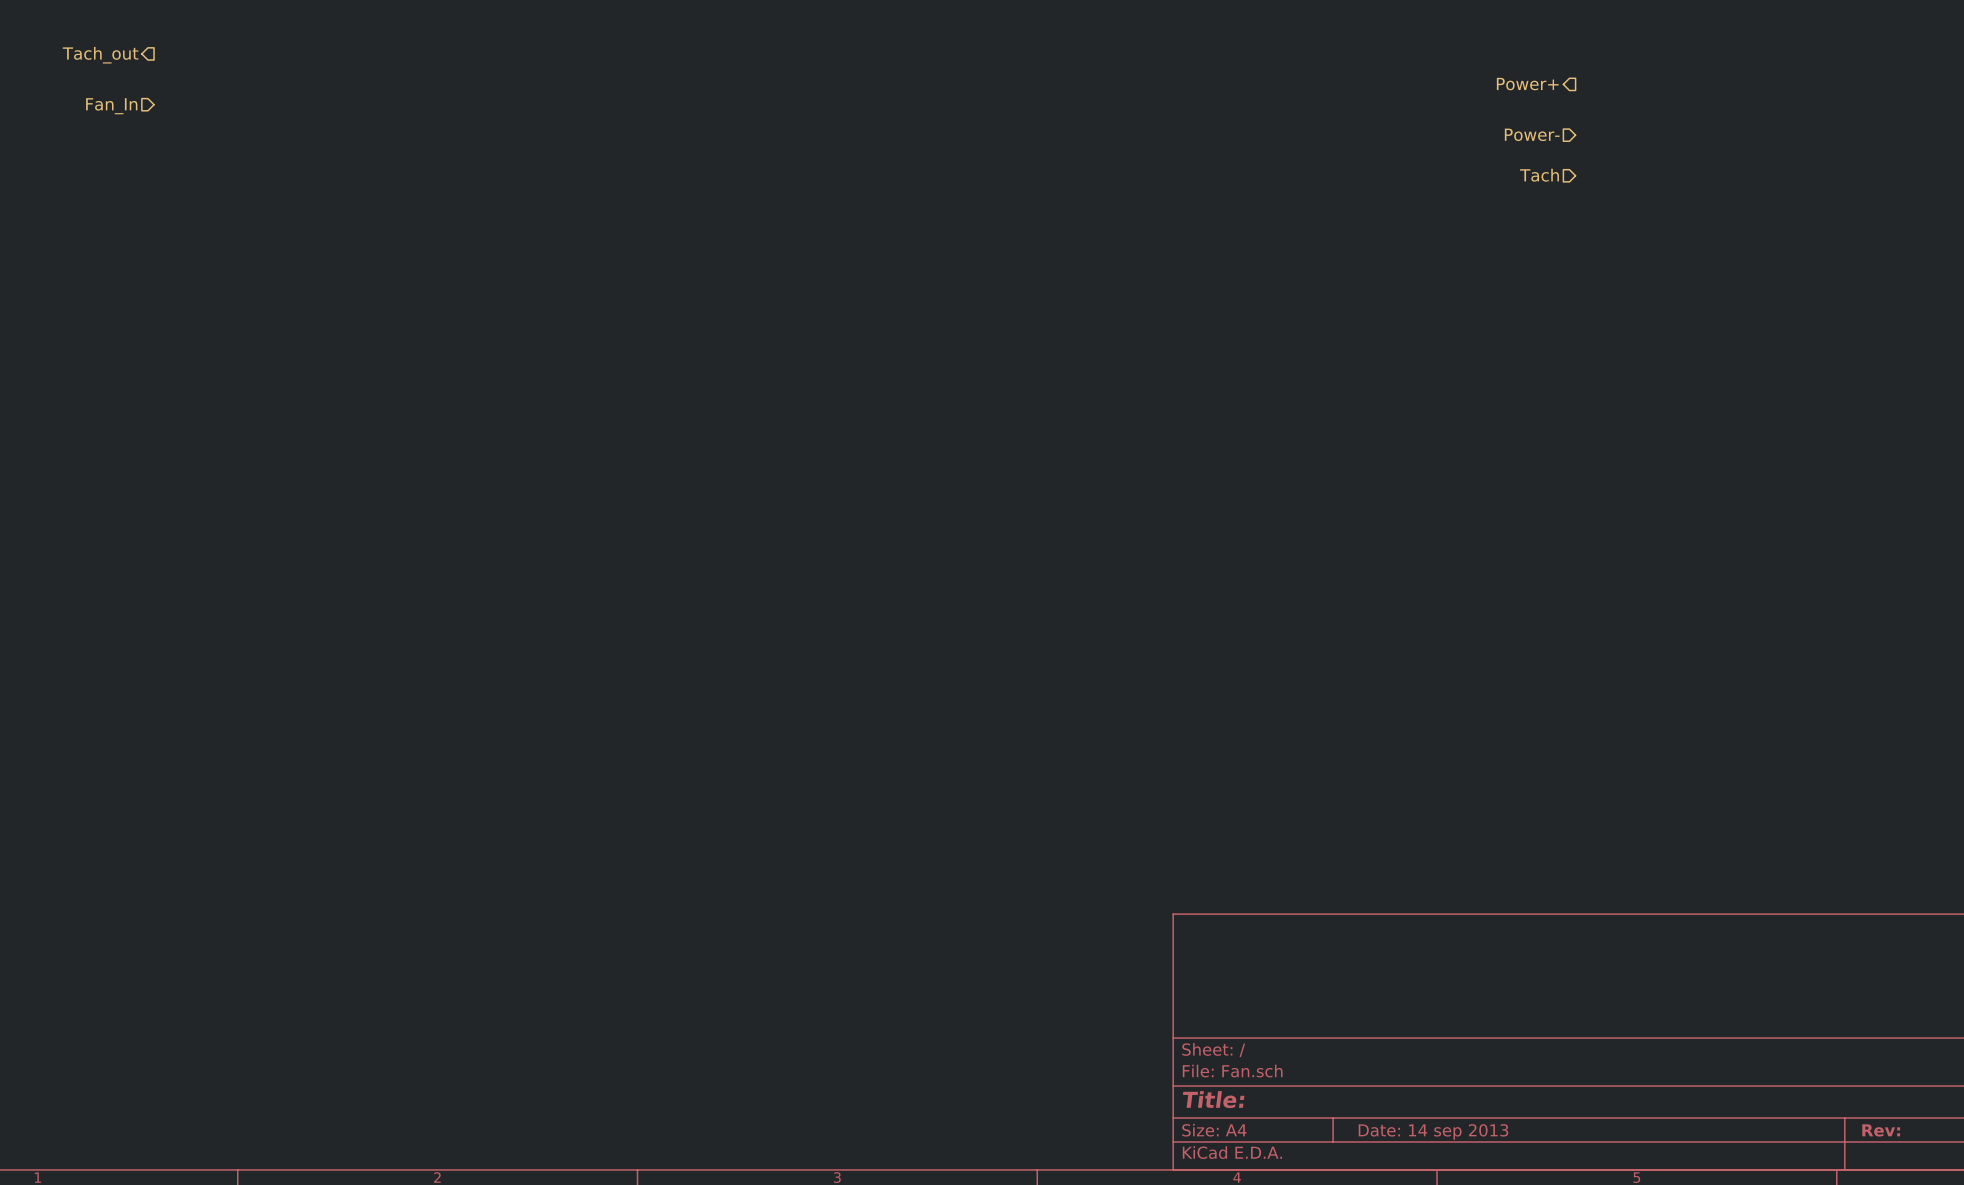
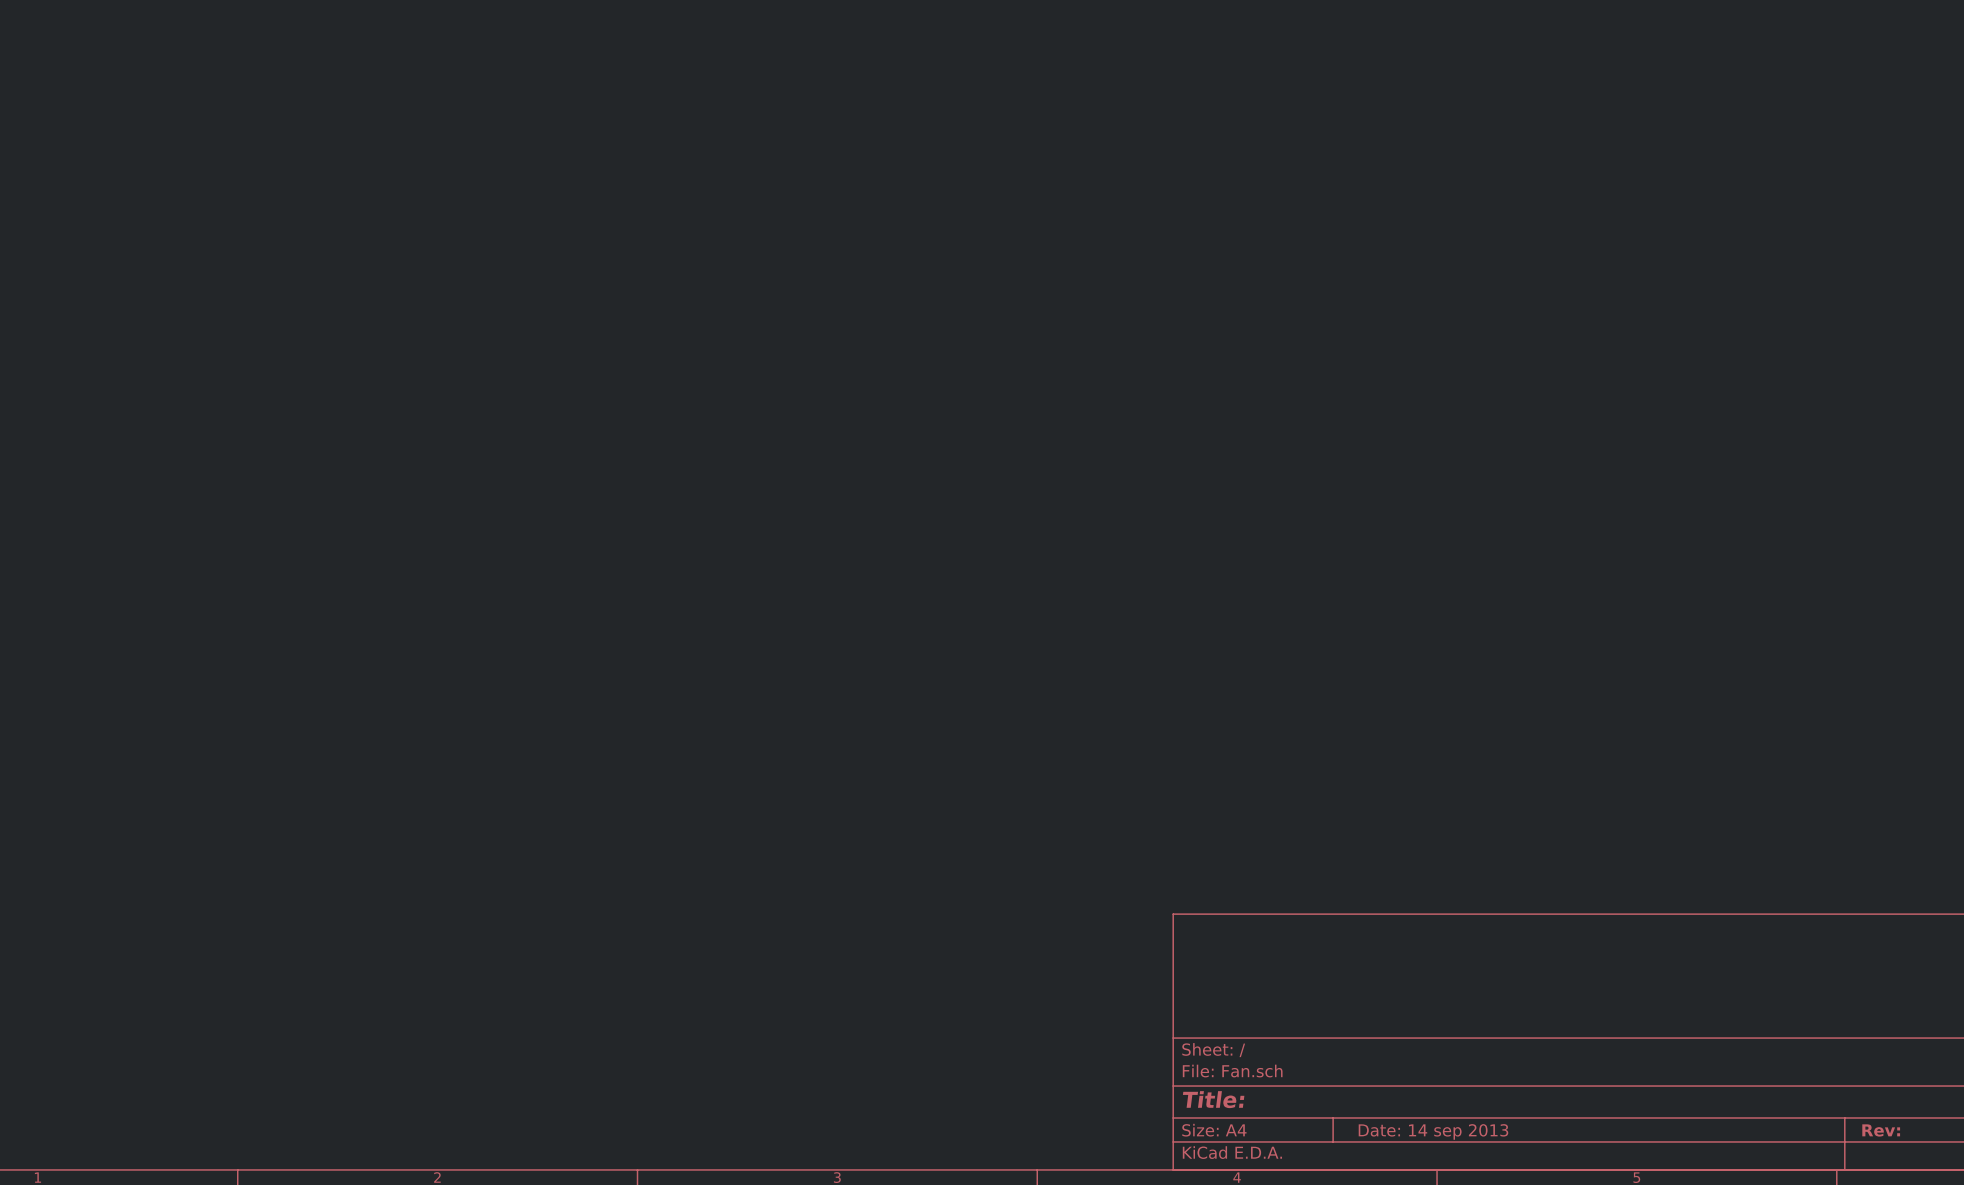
hierarchical label: Tach_out (100, 55) -> none
hierarchical label: Power+ (1527, 84) -> none
hierarchical label: Fan_In (111, 106) -> none
hierarchical label: Power- (1532, 134) -> none
hierarchical label: Tach (1539, 175) -> none

